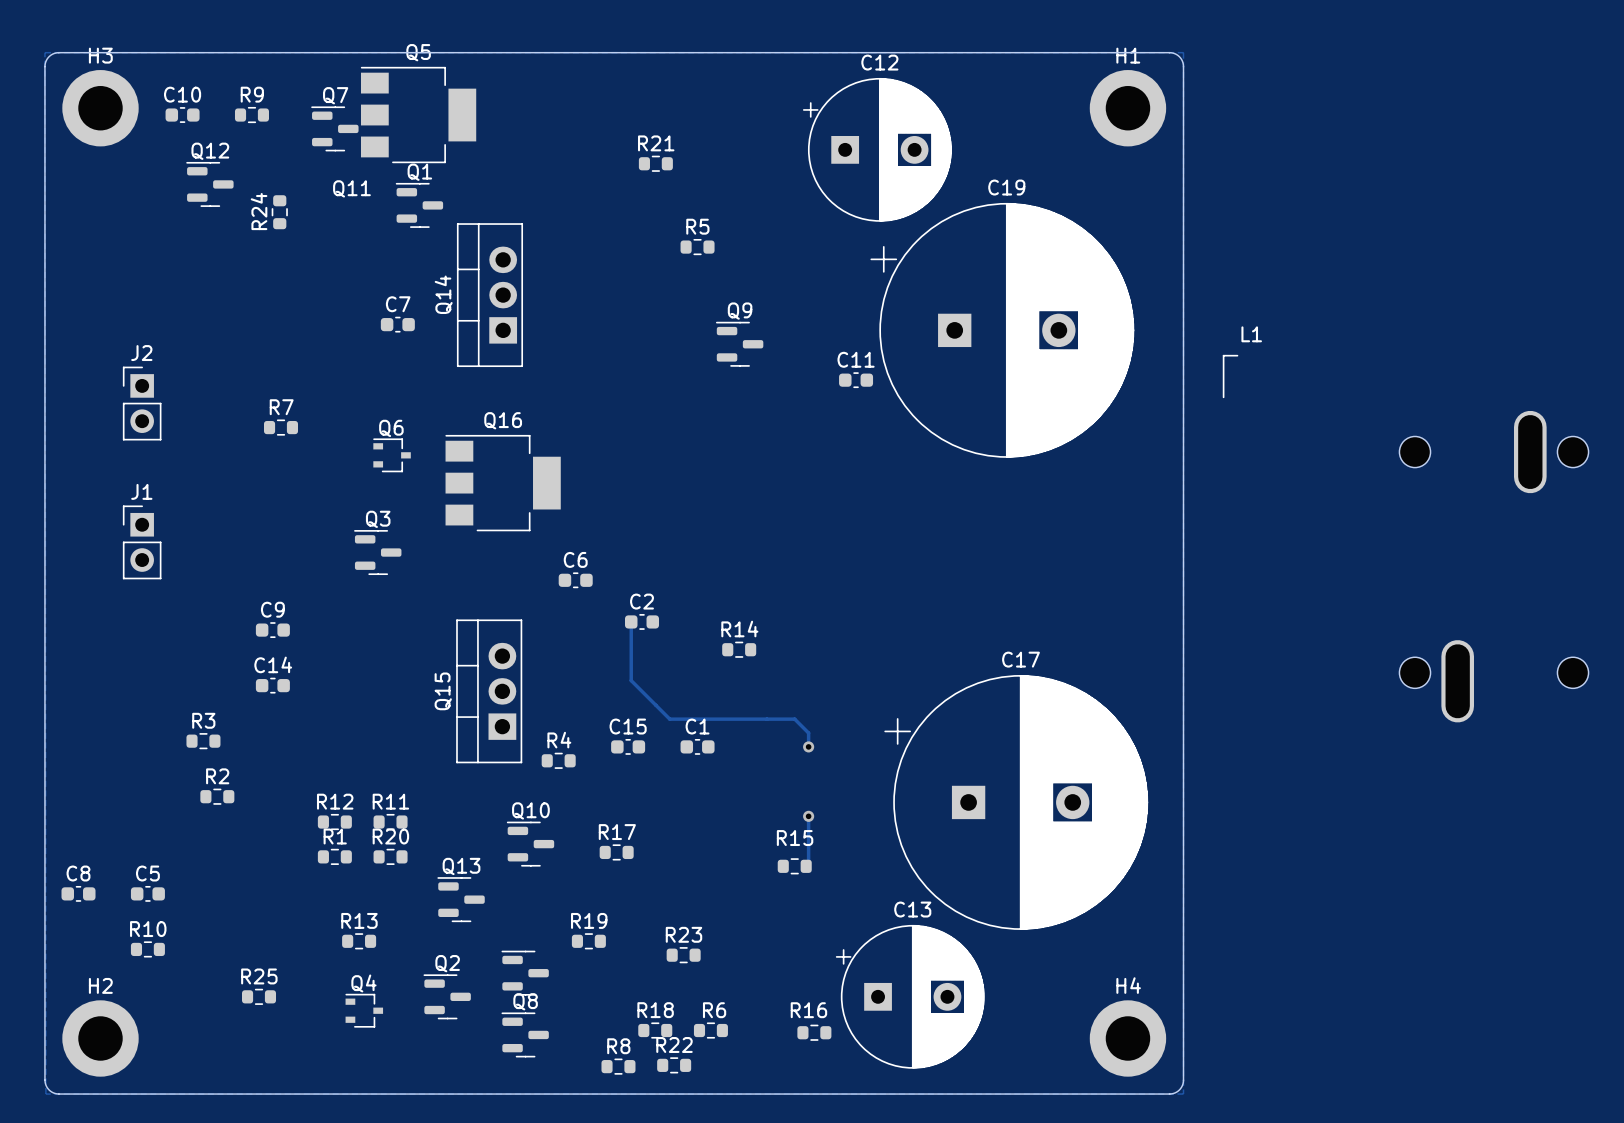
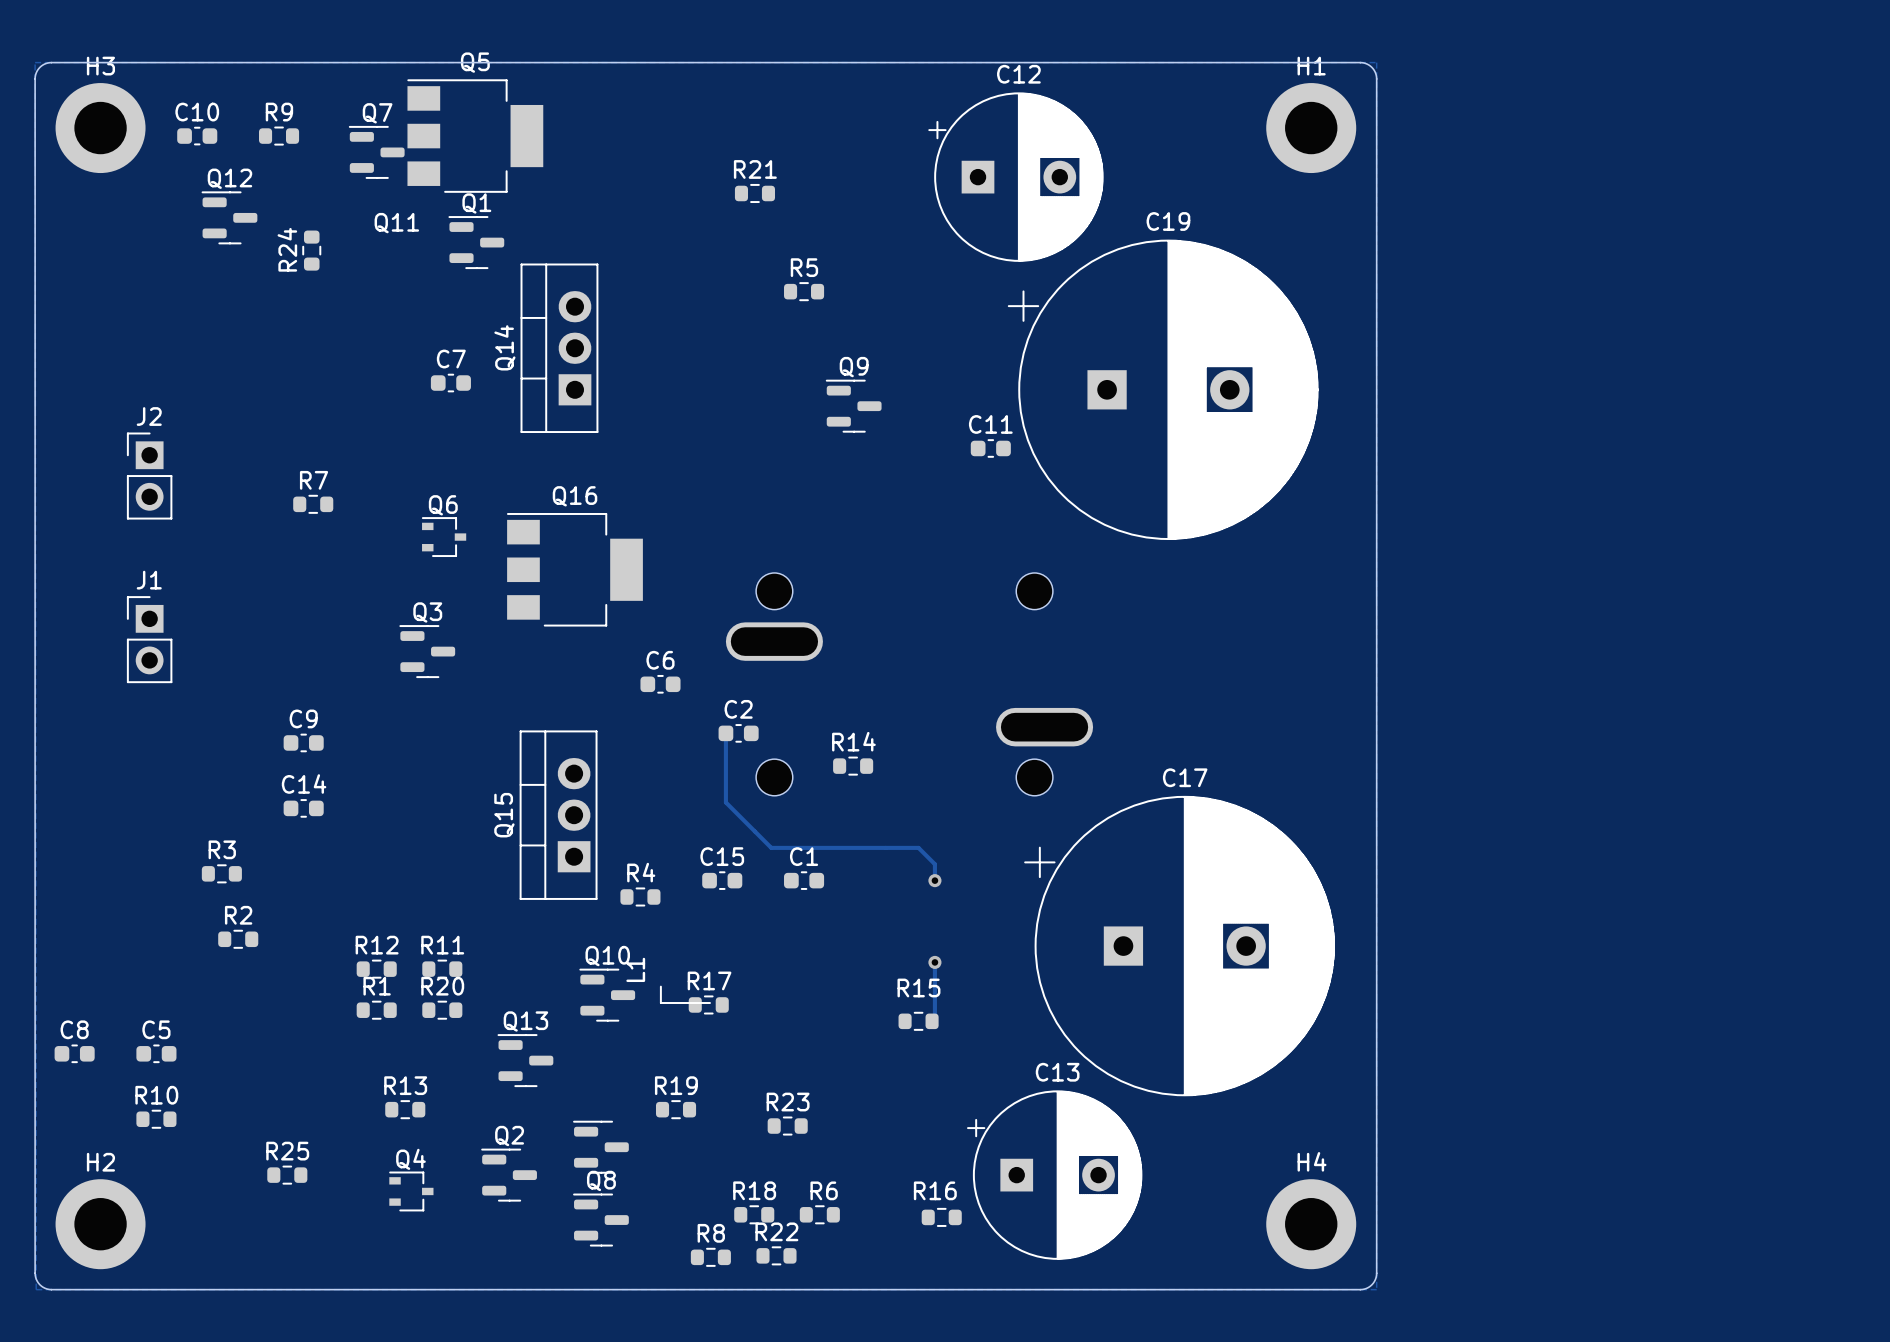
L1 rotation: 0° (1405, 538) -> 90° counterclockwise (876, 788)
L1 position: (1405, 538) -> (876, 788)

